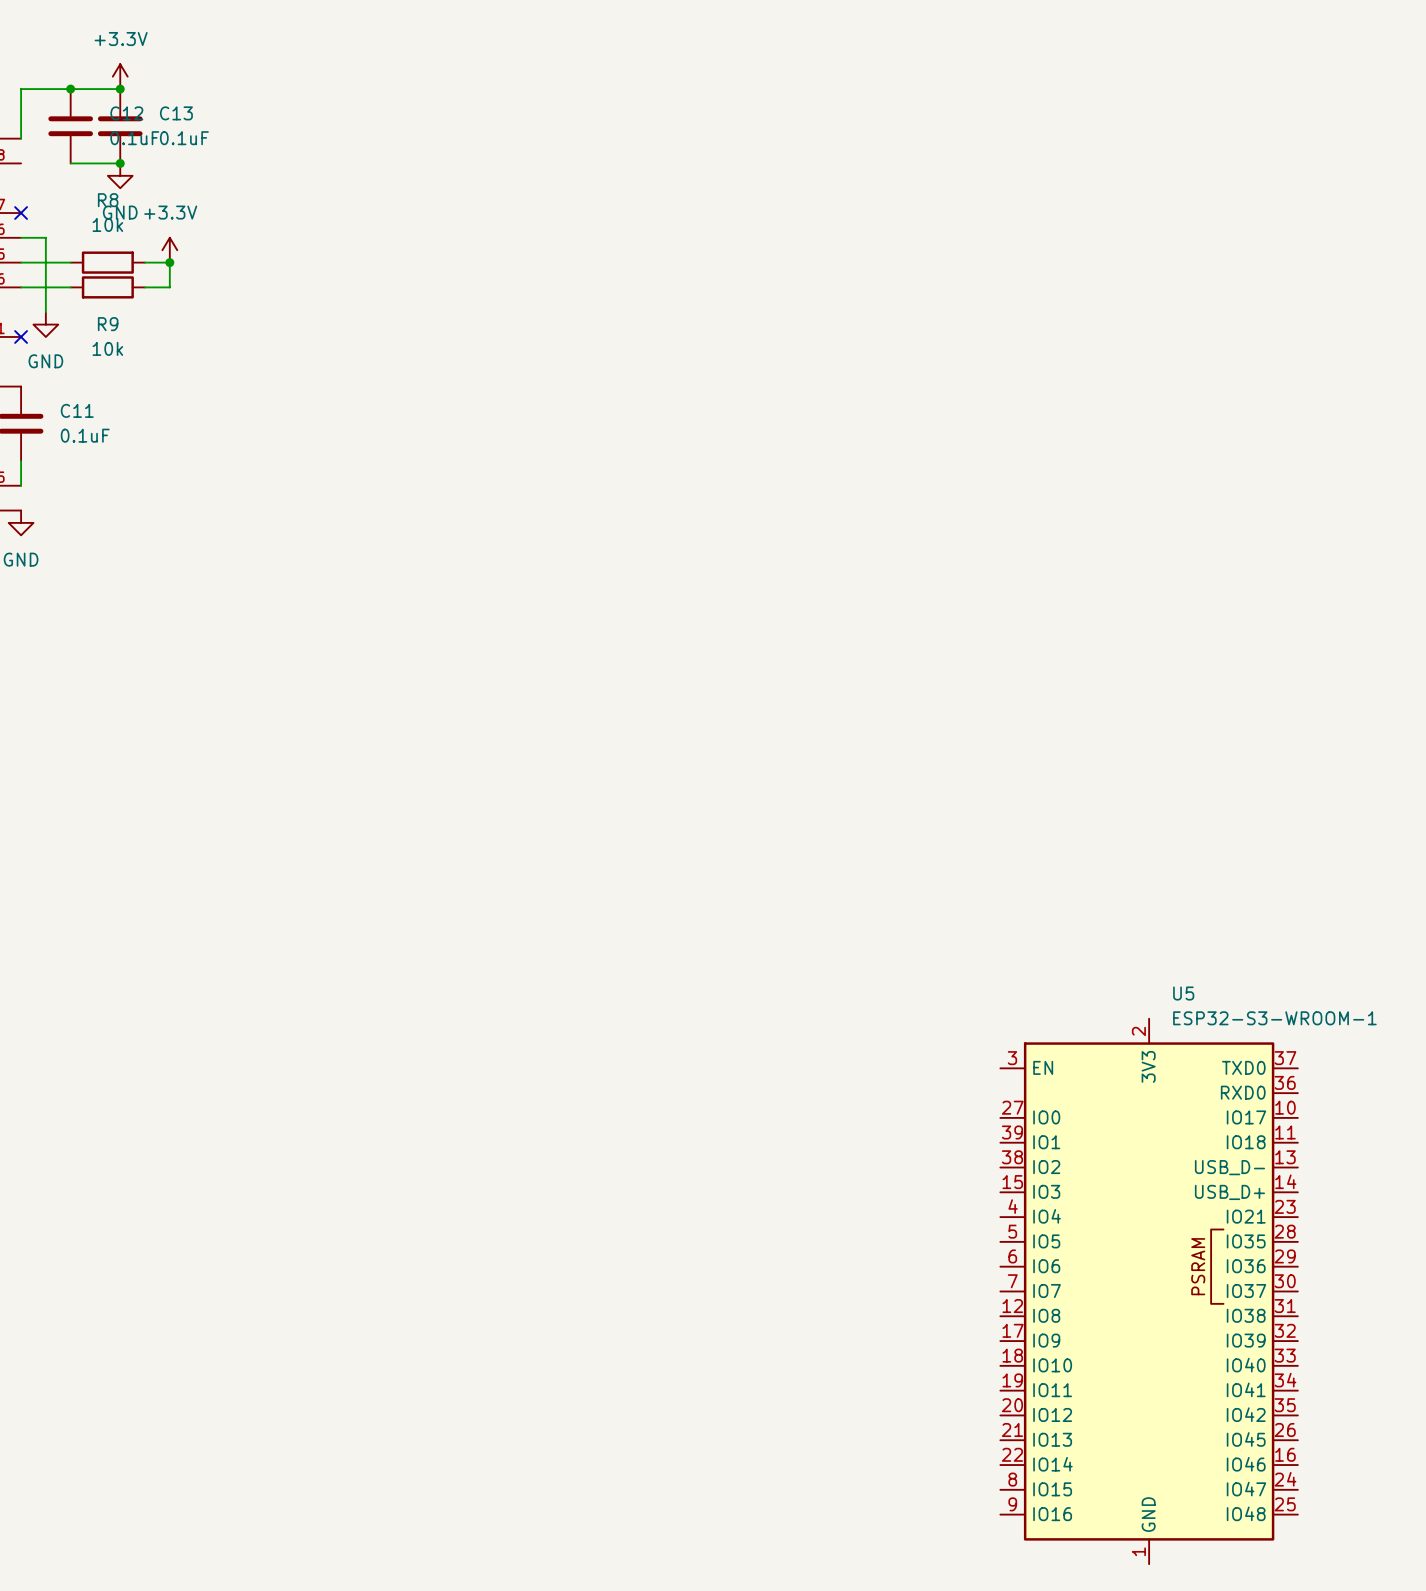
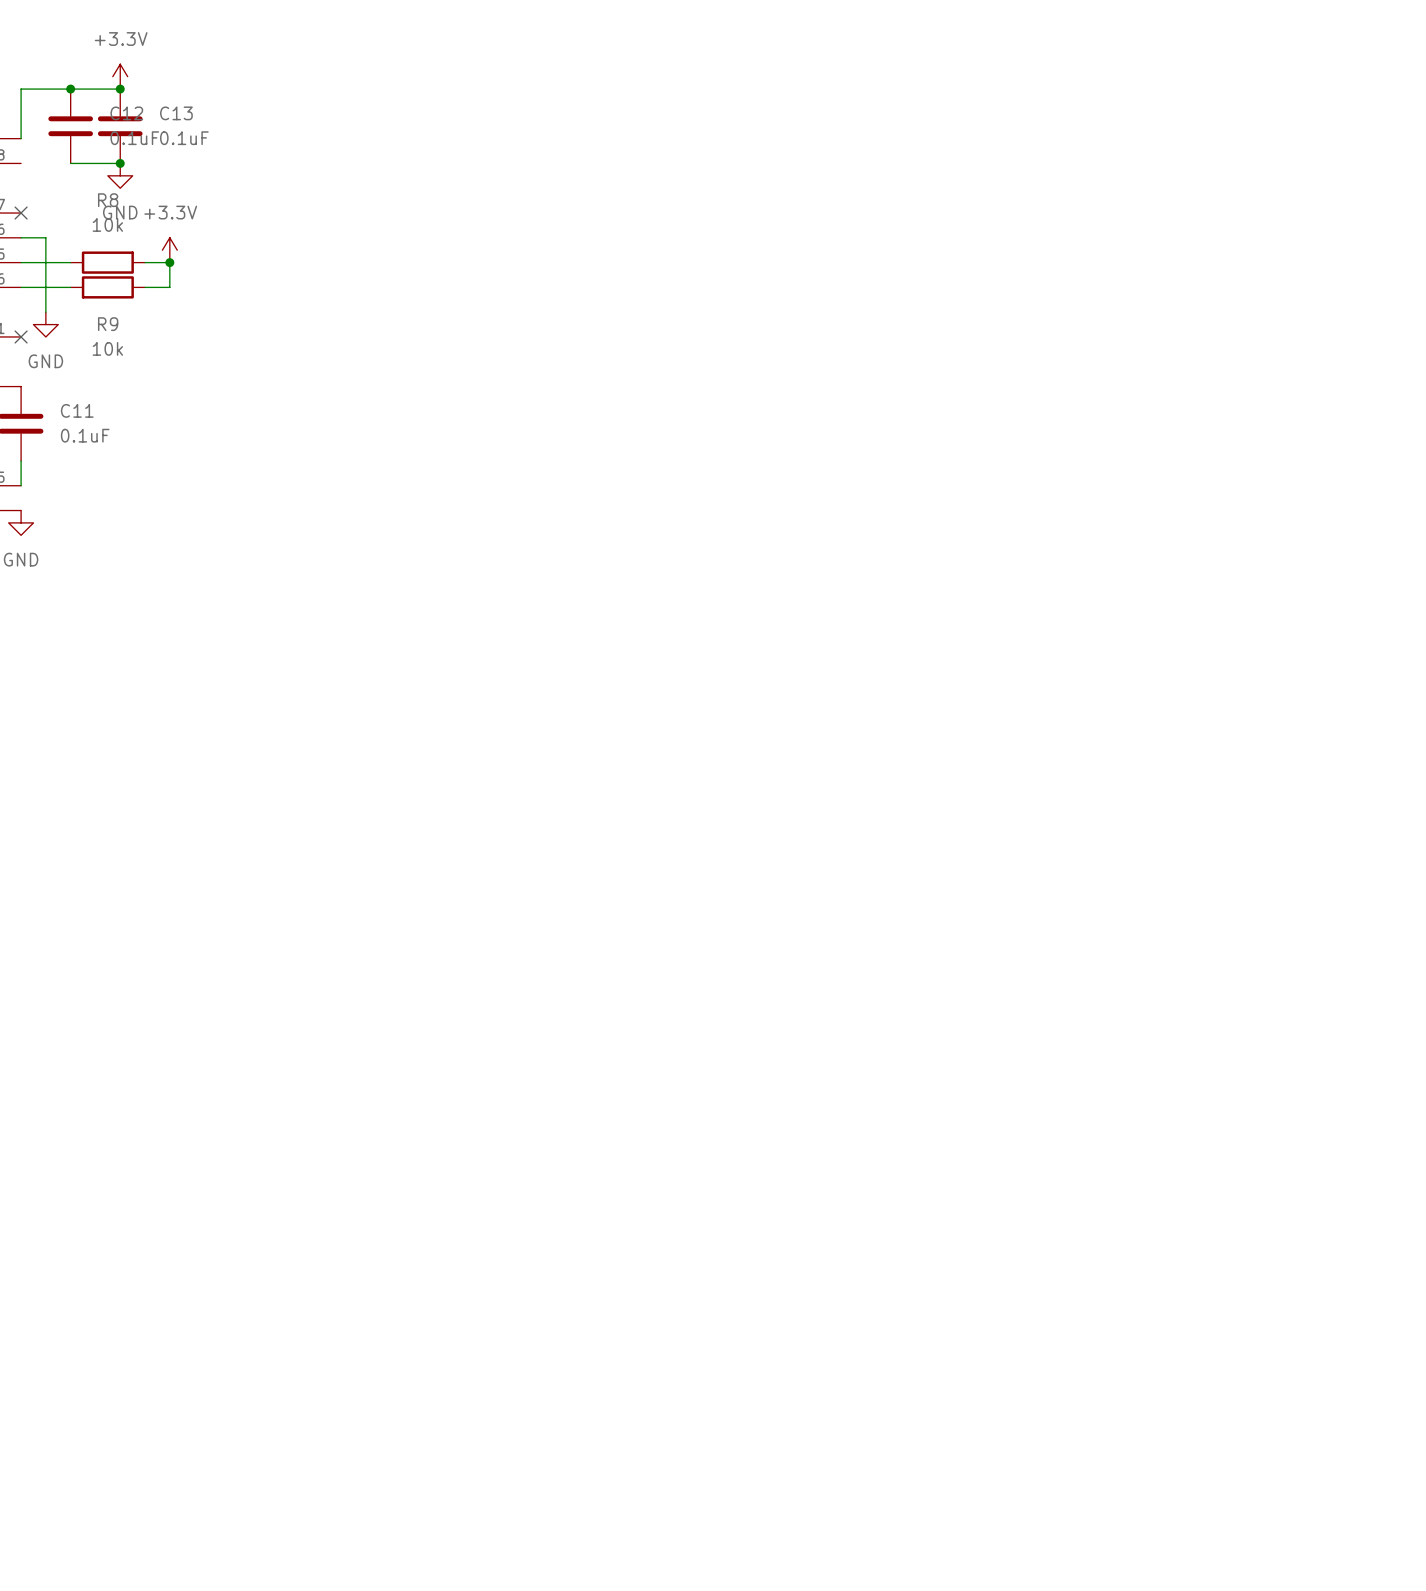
U5: ESP32-S3-WROOM-1 (1149, 1291) -> none

